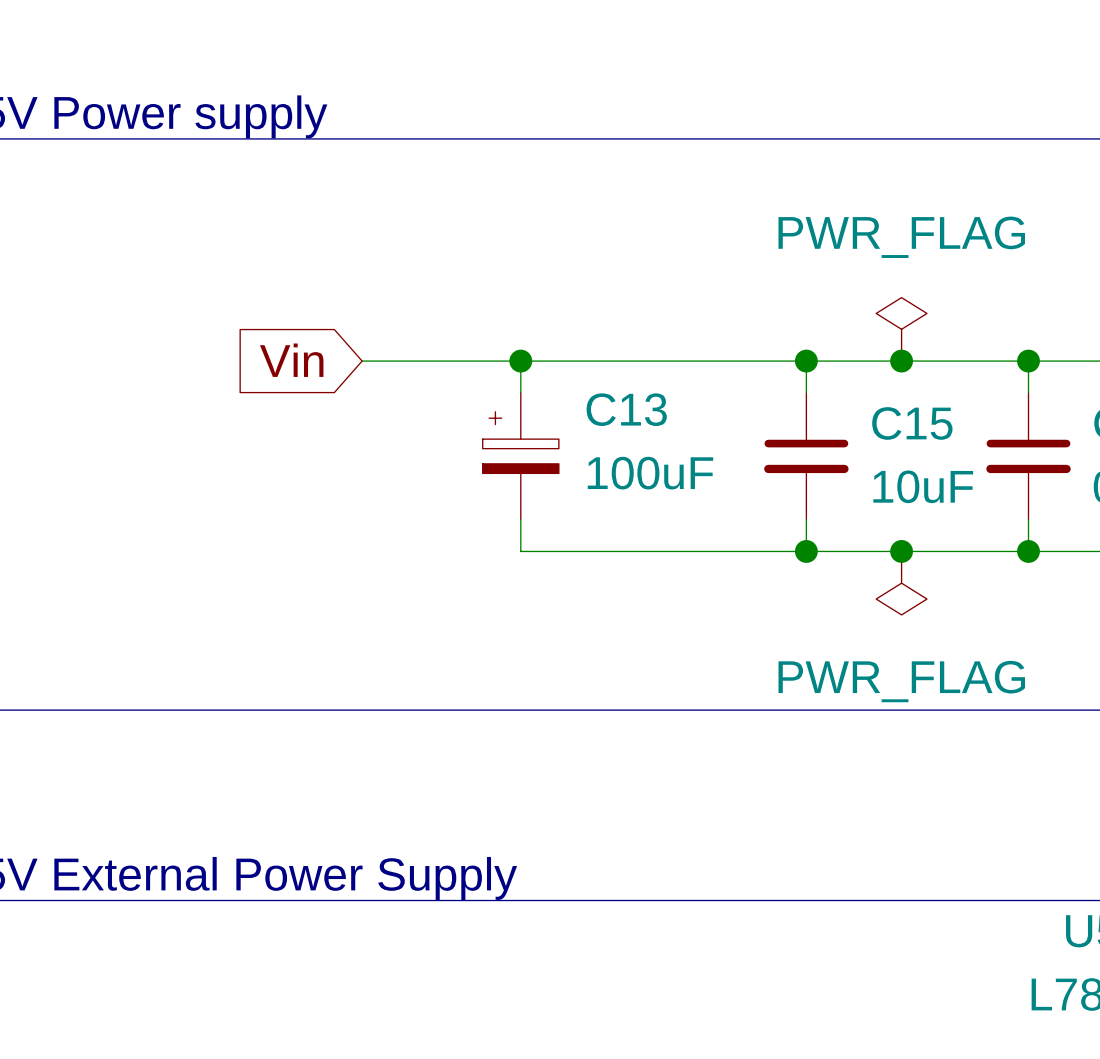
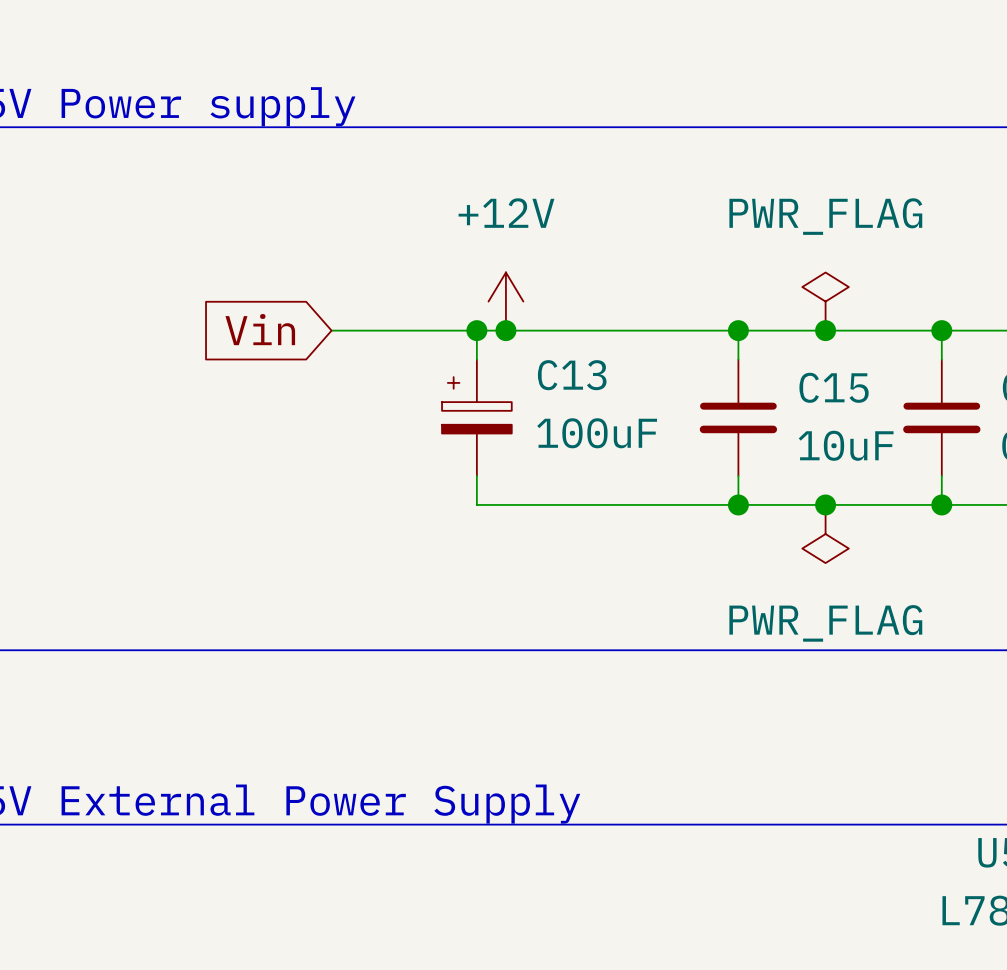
power symbol: none -> +12V (505, 301)
junction: none -> (505, 330)

